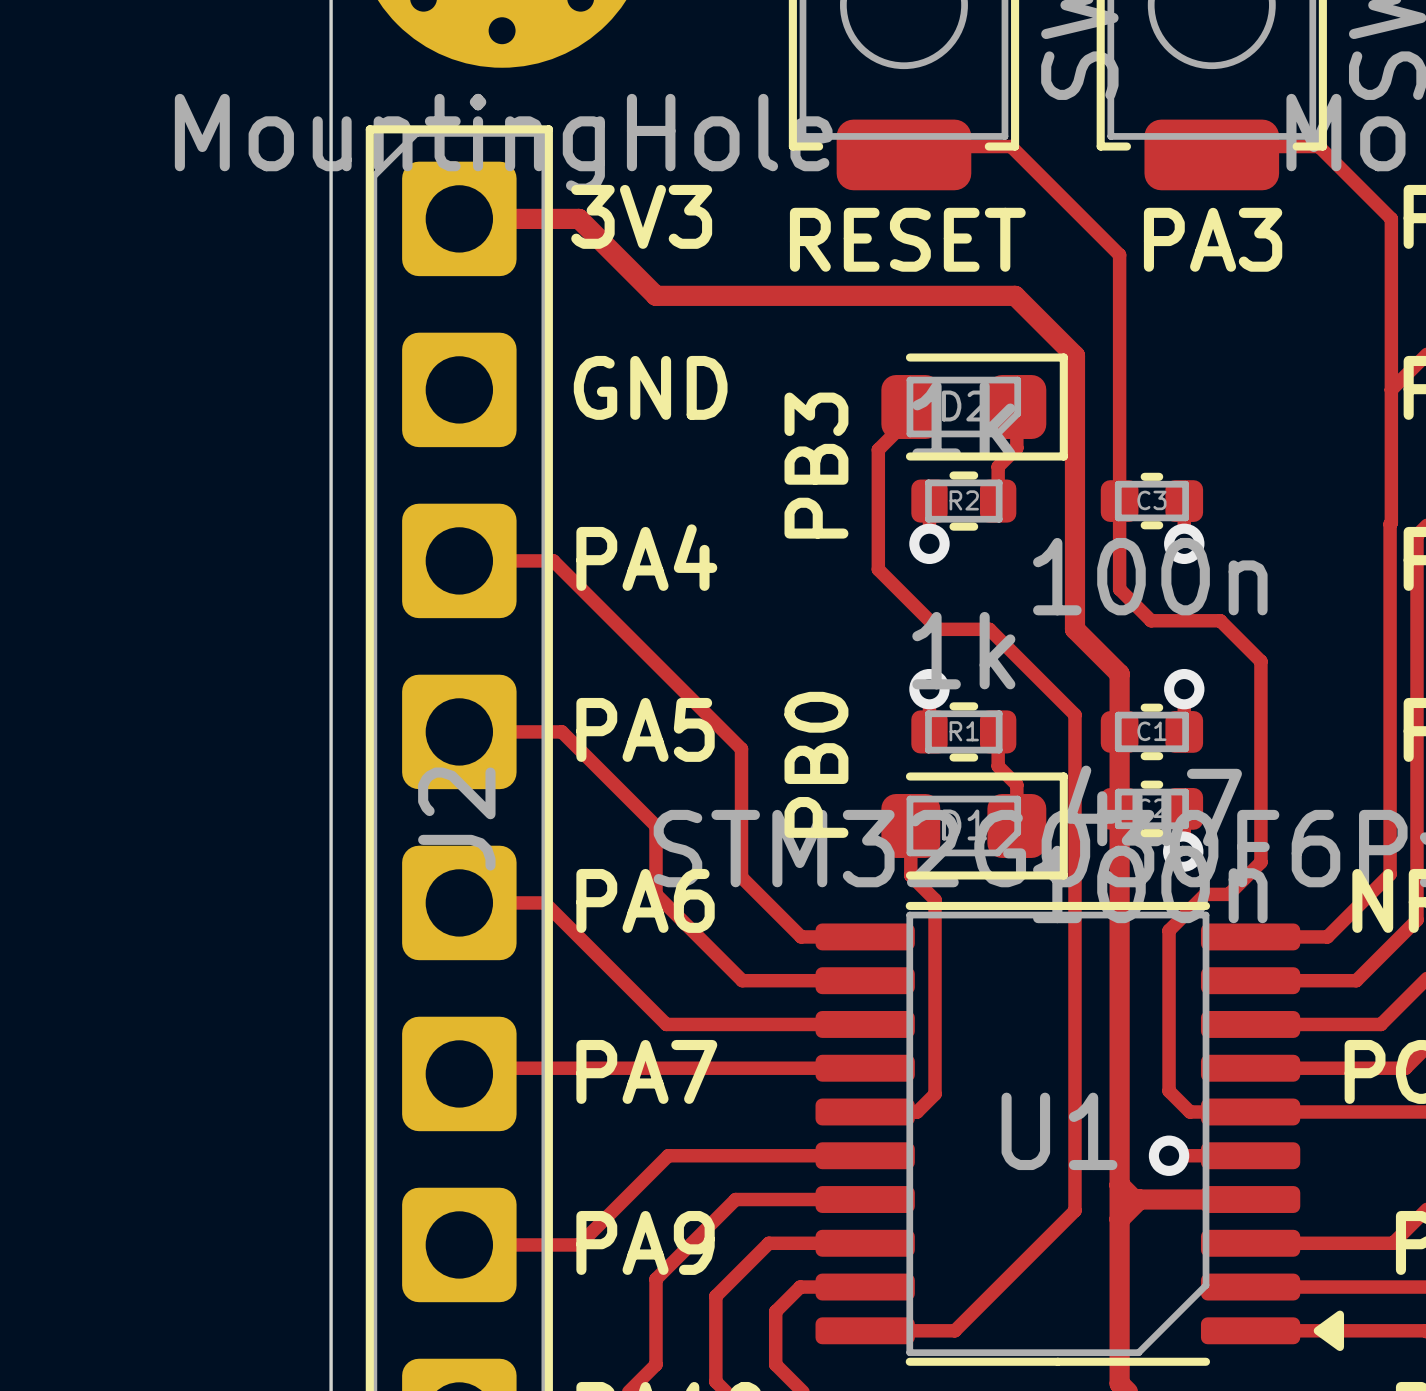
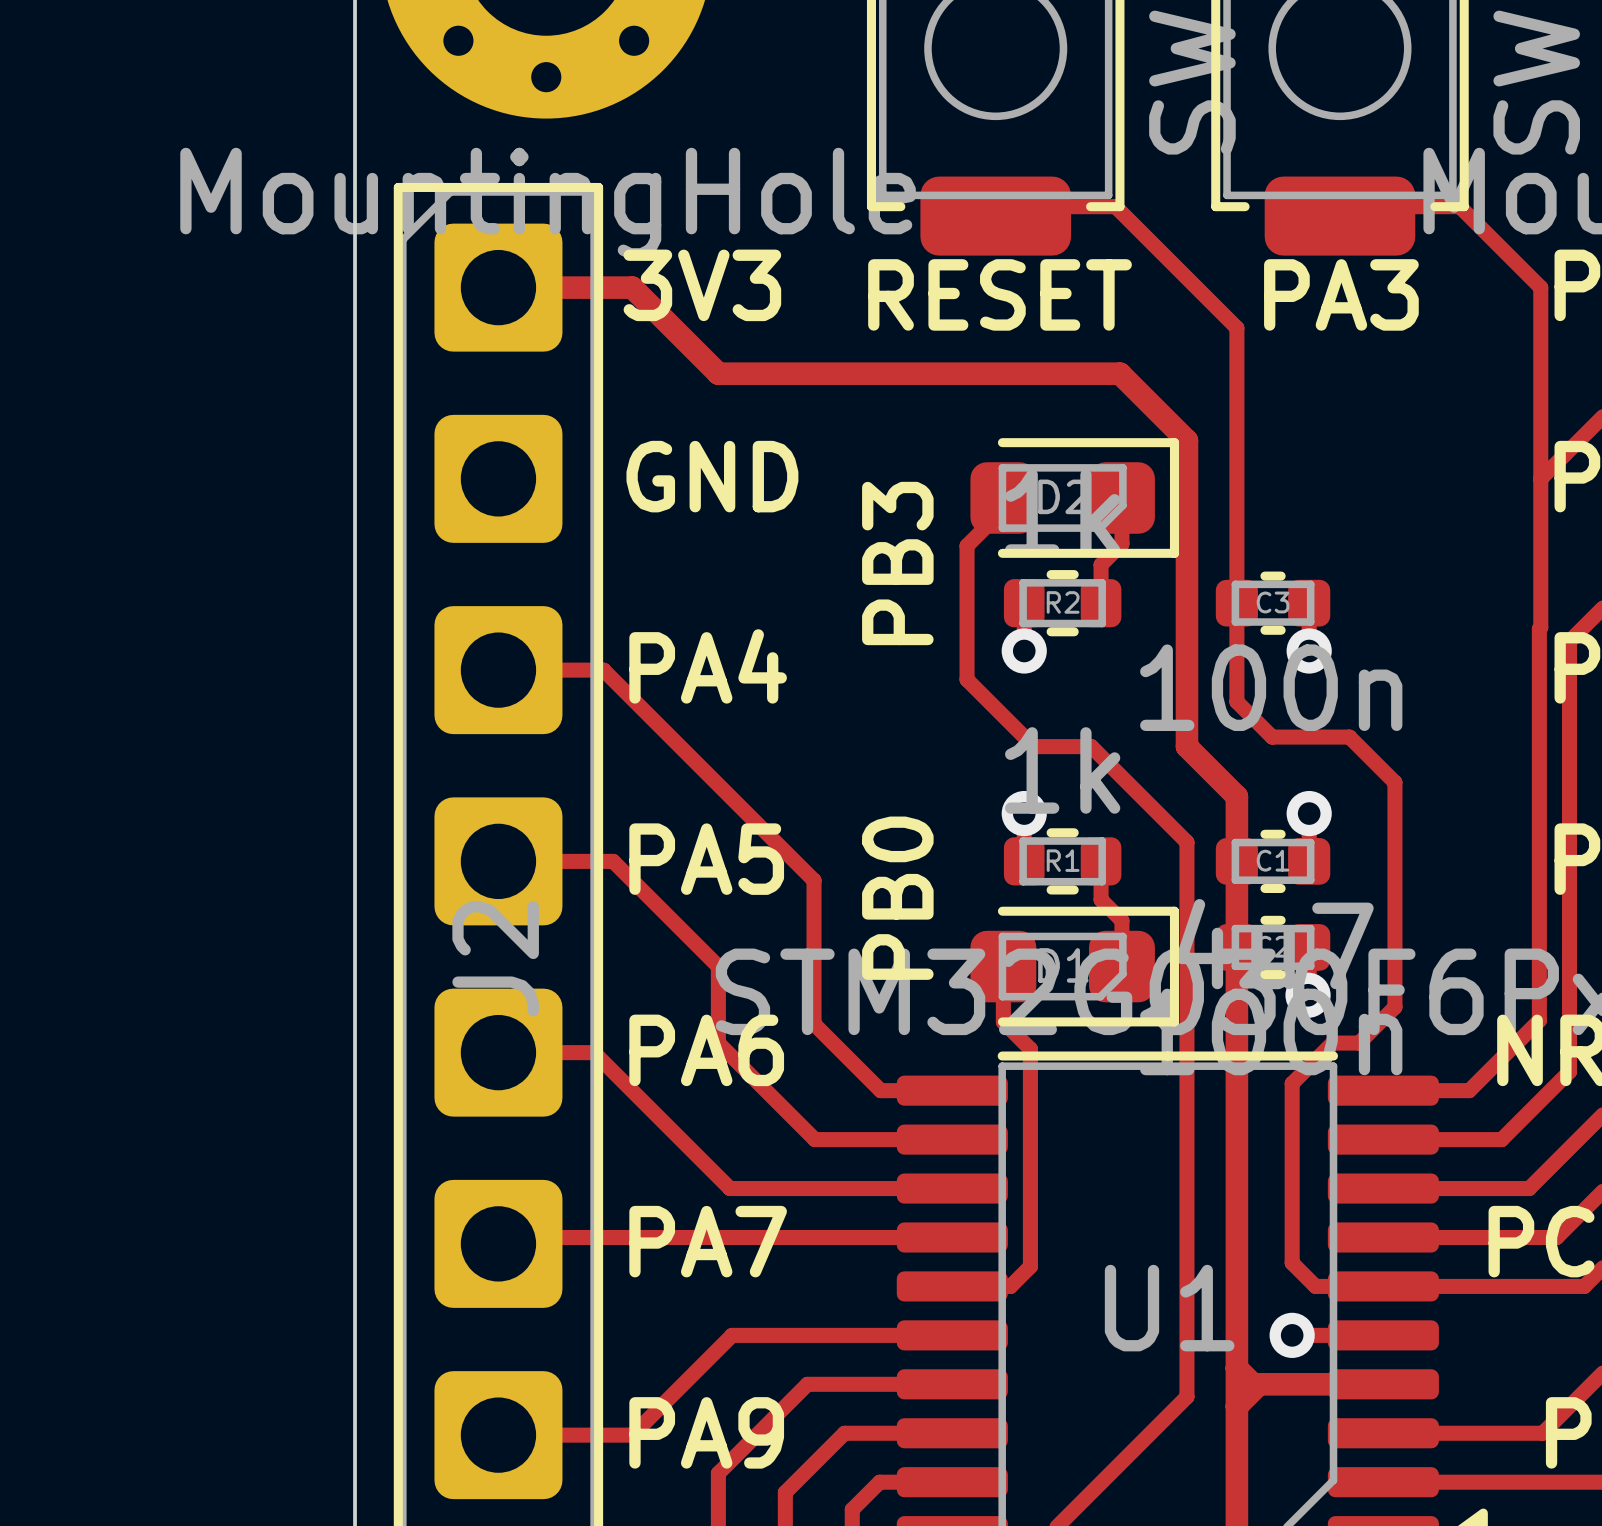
text position: RESET (907, 239) -> RESET (1000, 294)
text position: PA3 (1213, 239) -> PA3 (1341, 294)

